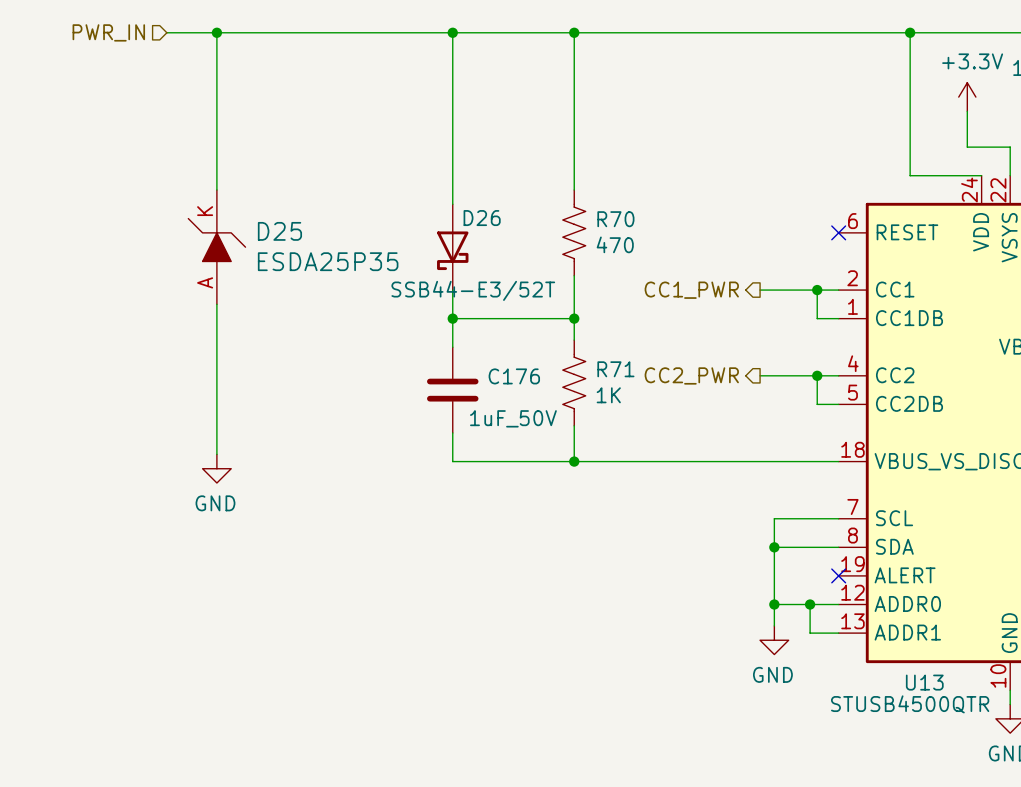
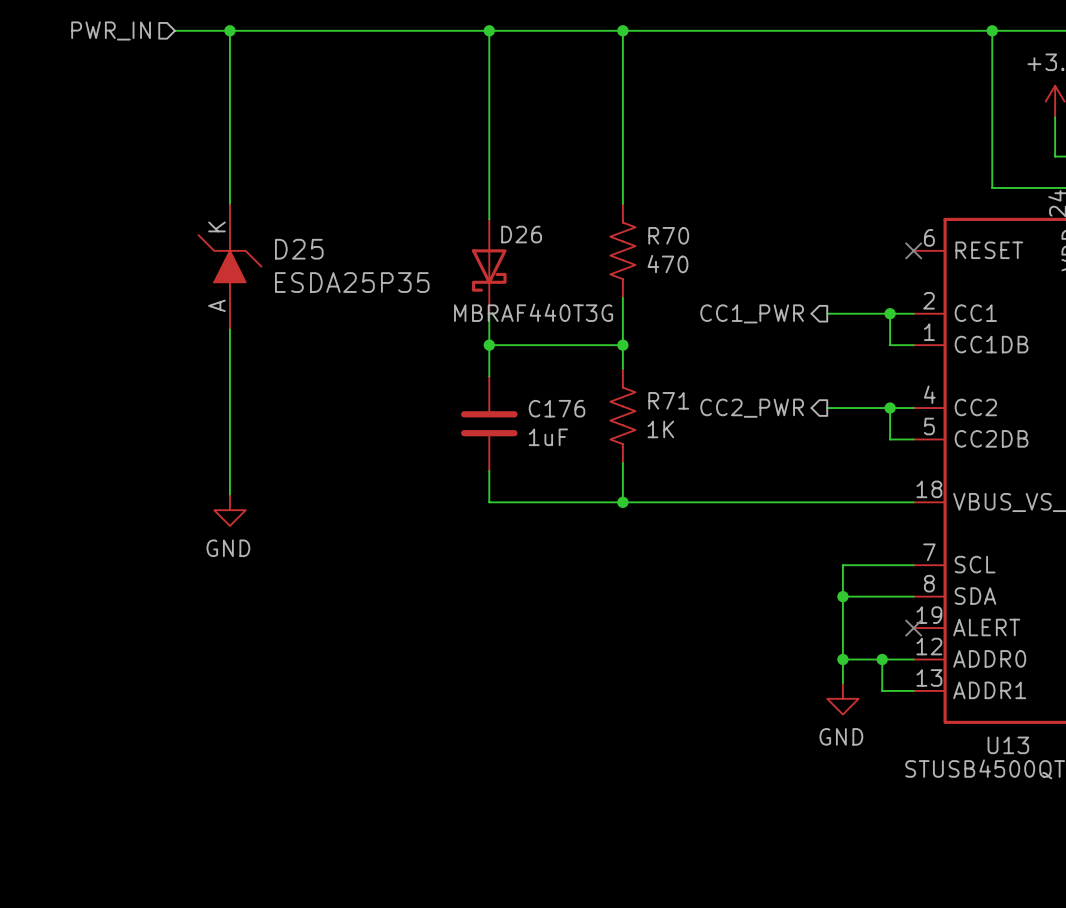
D26 value: SSB44-E3/52T (473, 290) -> MBRAF440T3G (533, 312)
C176 value: 1uF_50V (513, 418) -> 1uF (548, 437)

